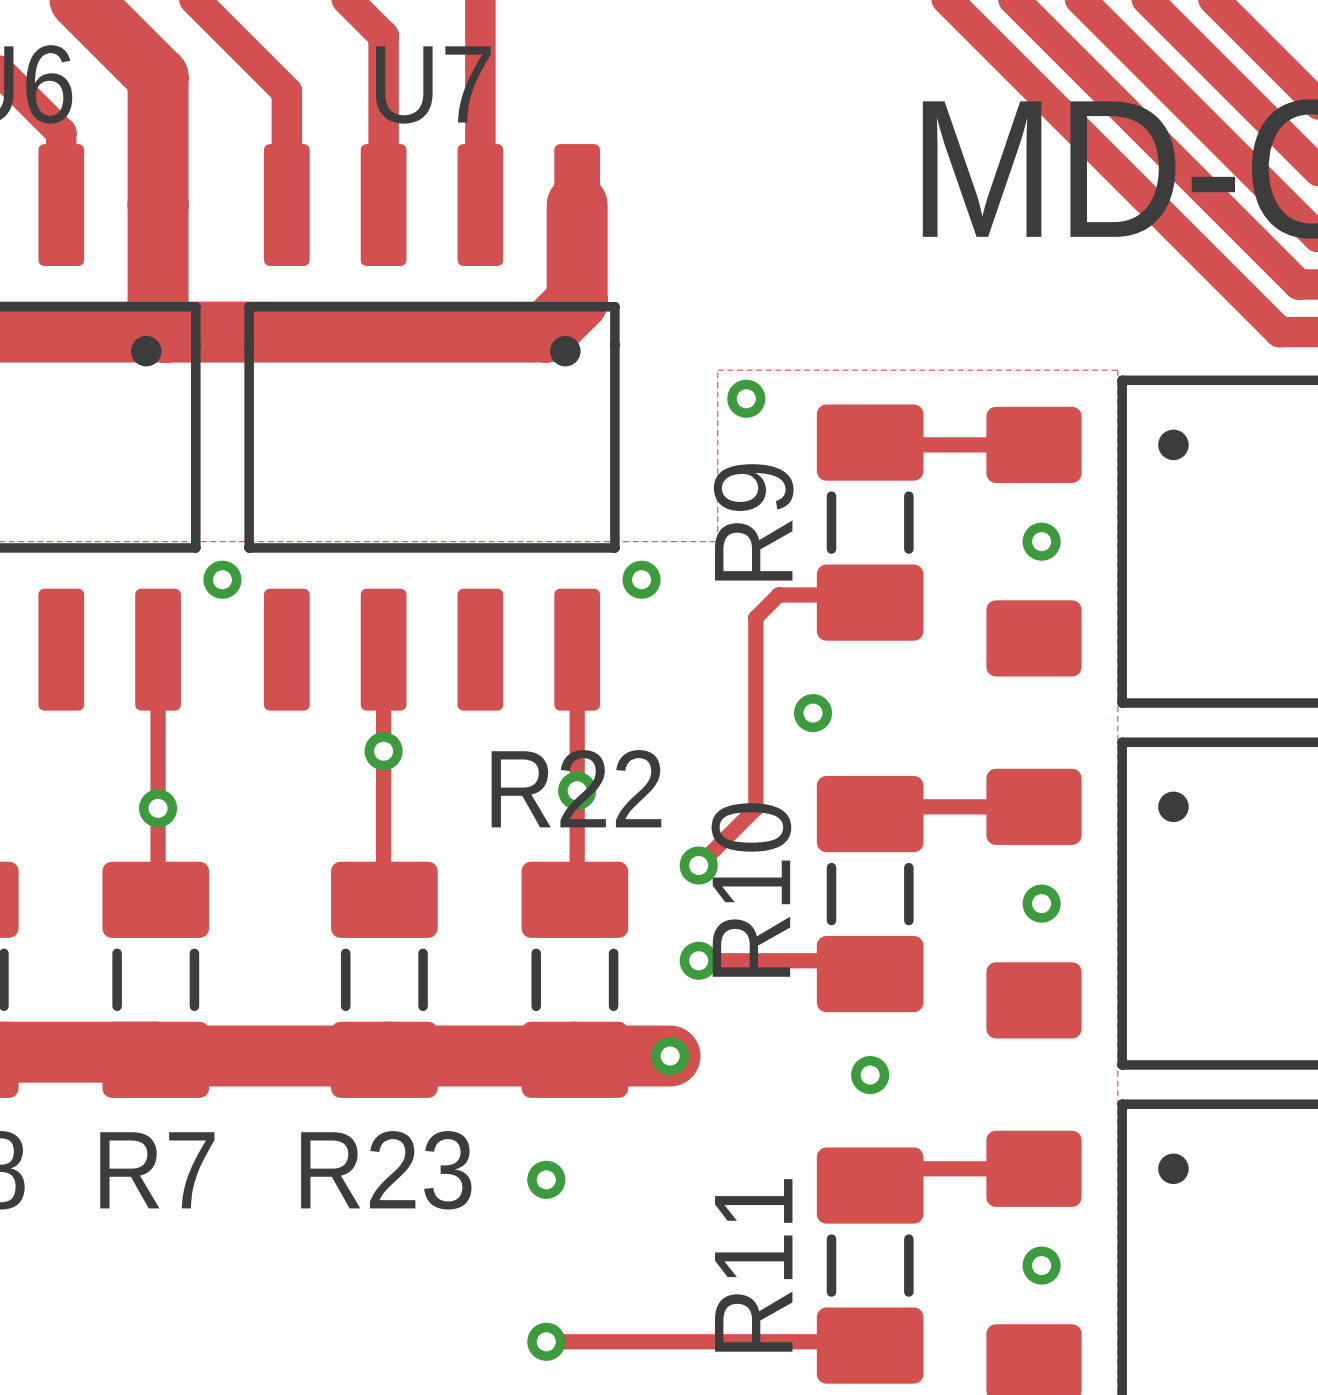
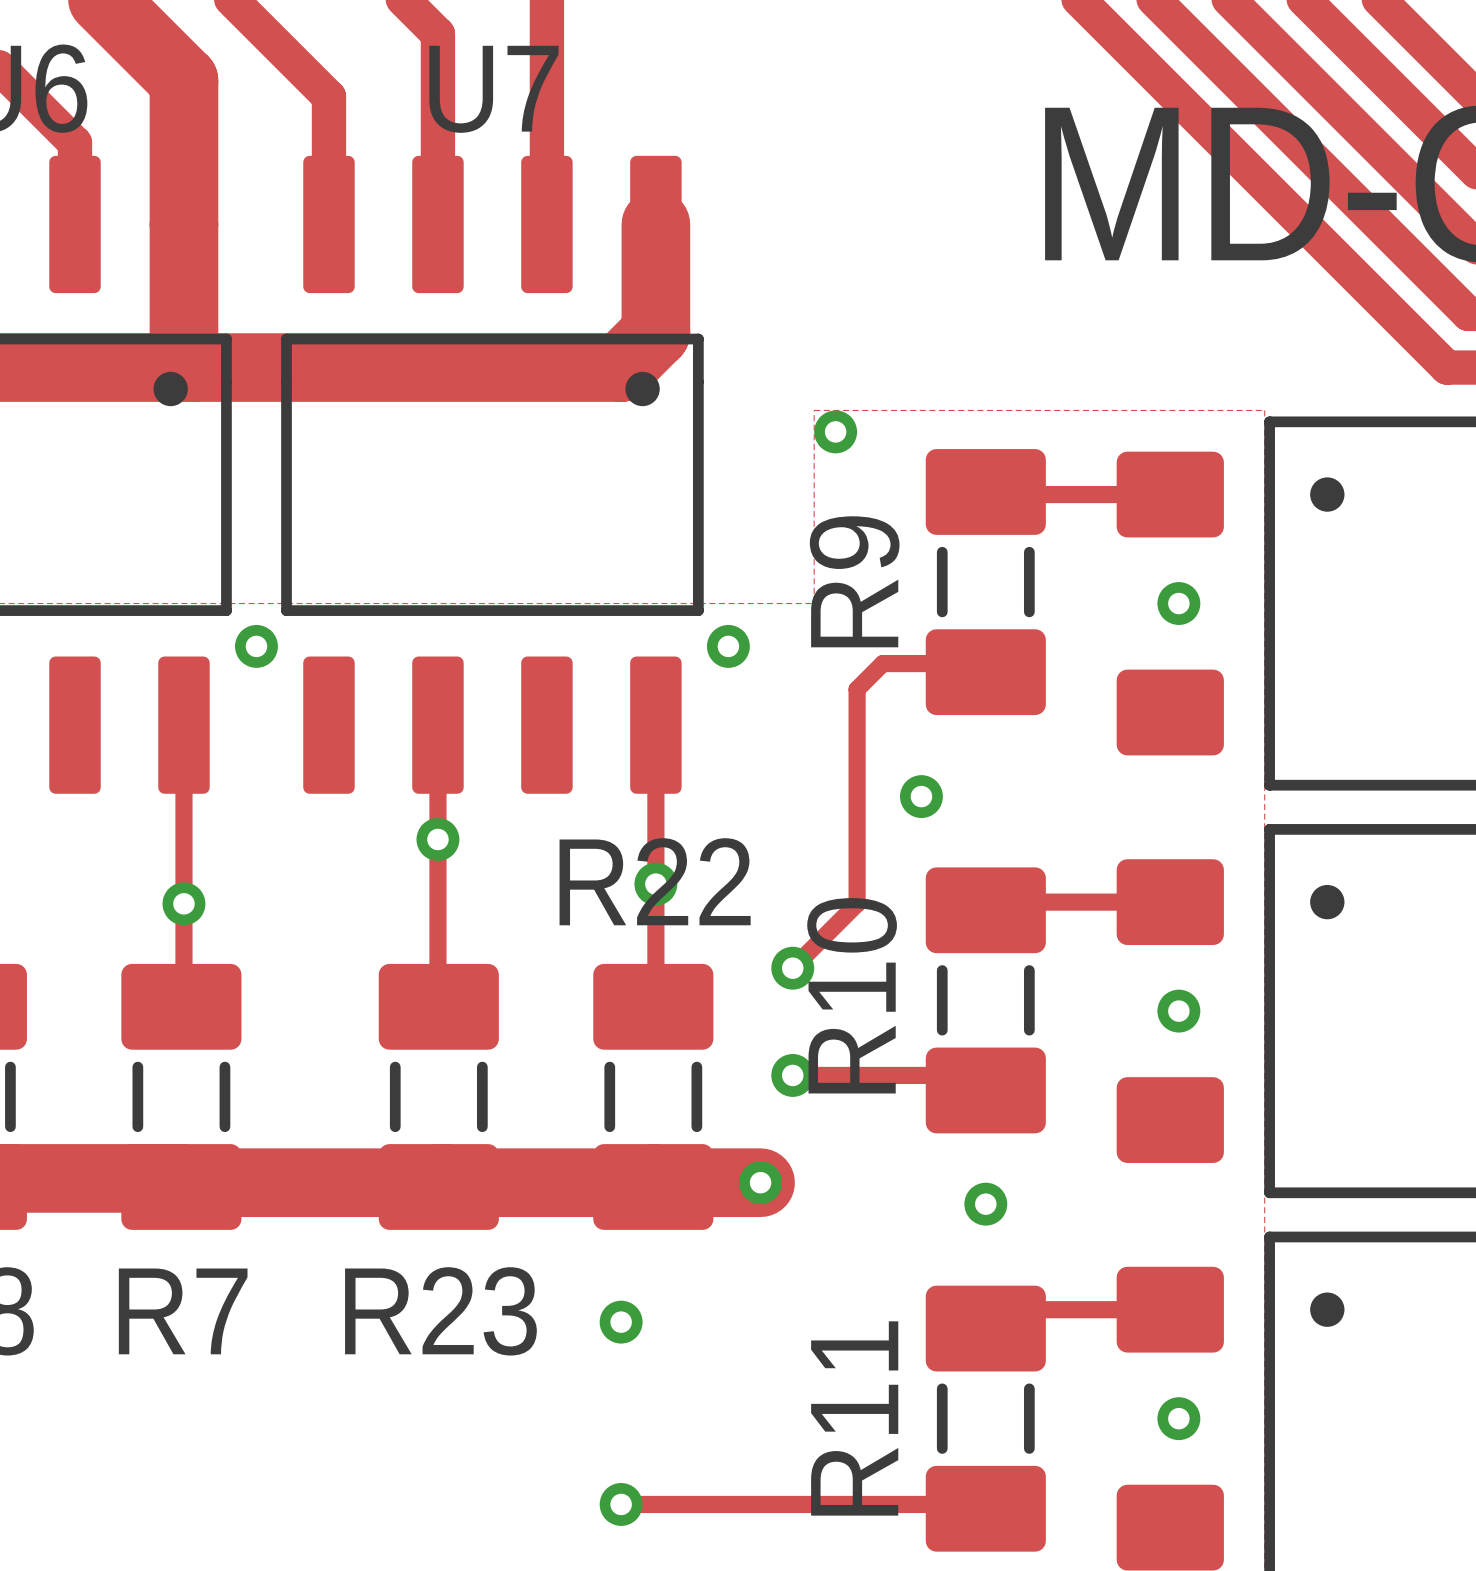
via position: (746, 398) -> (835, 431)

